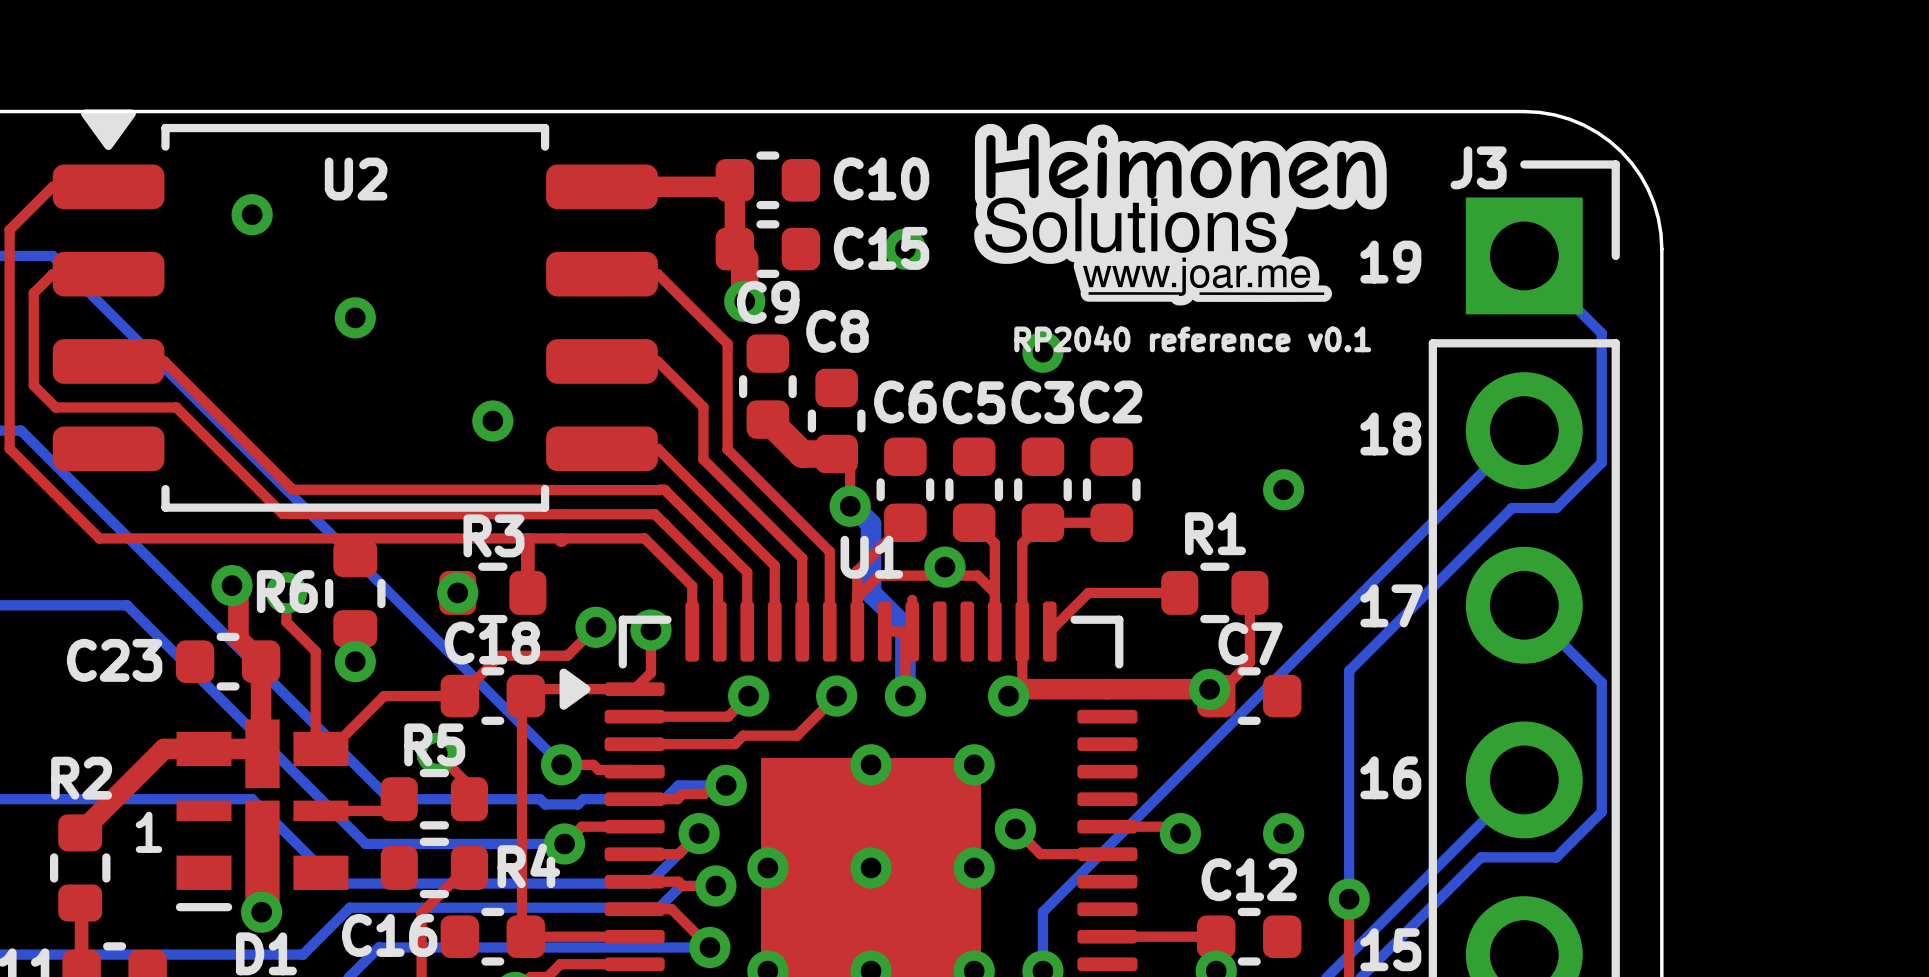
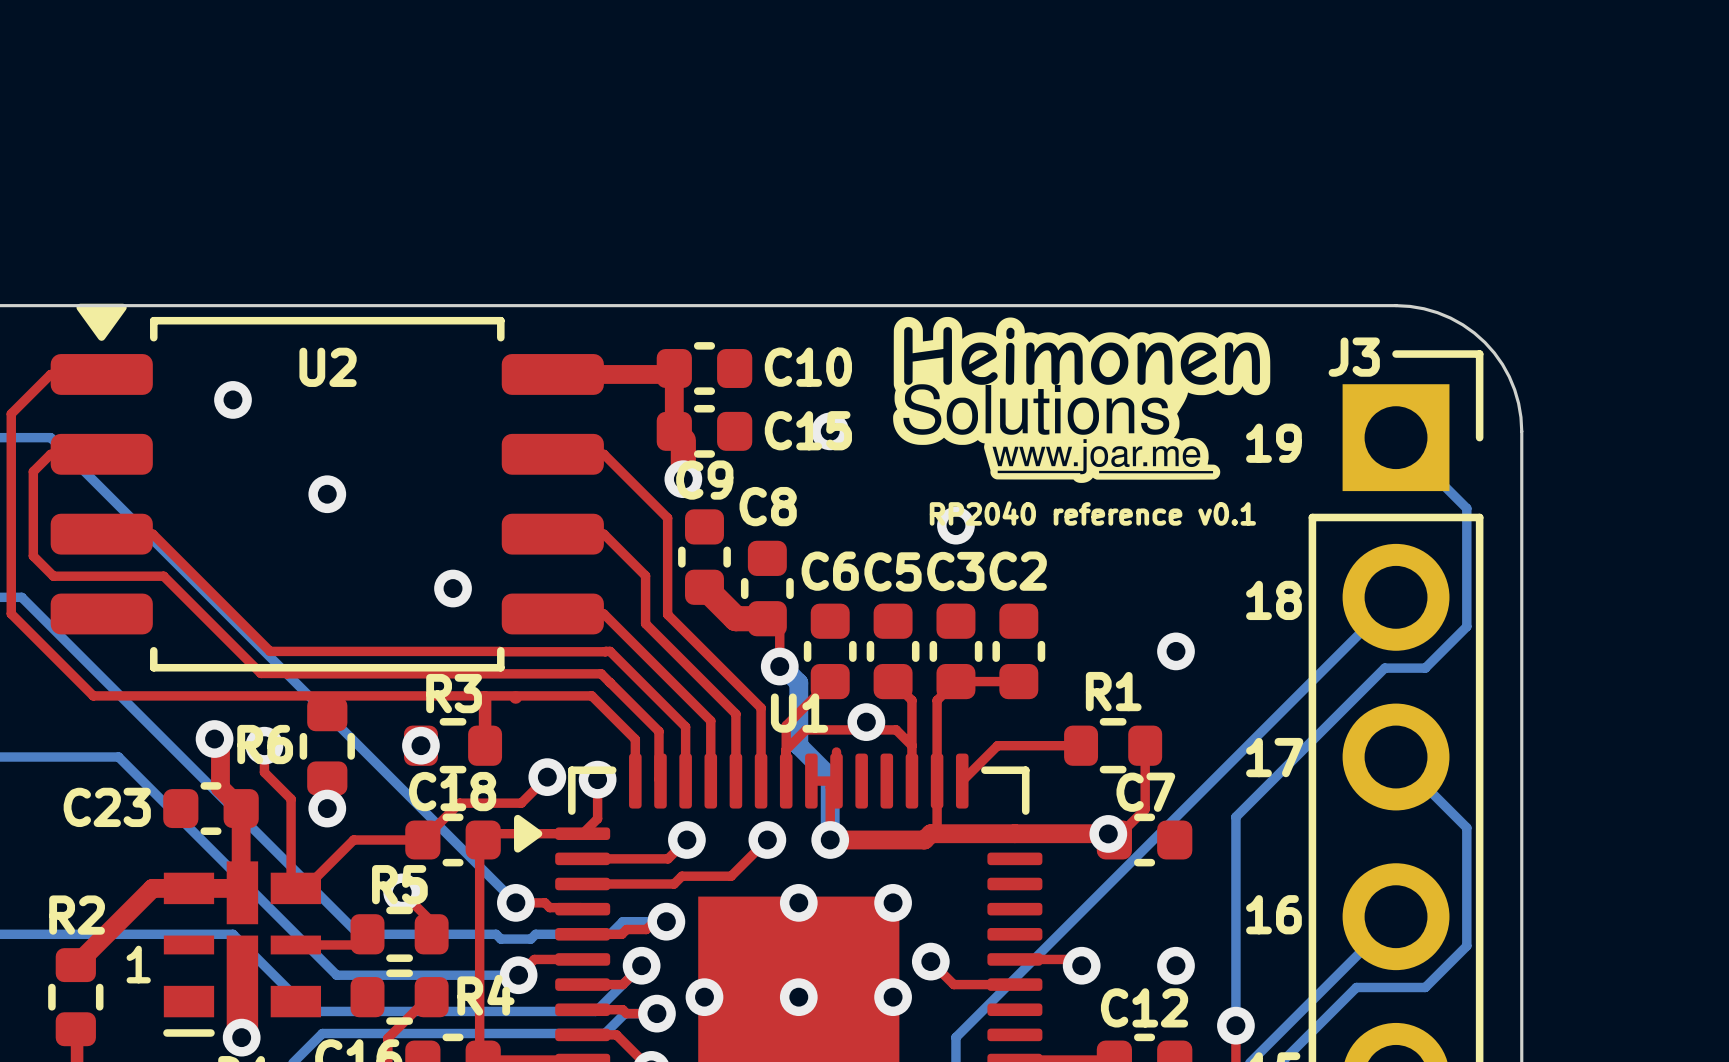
top track: none -> (830, 840) (924, 840)
via: (1008, 696) -> none

